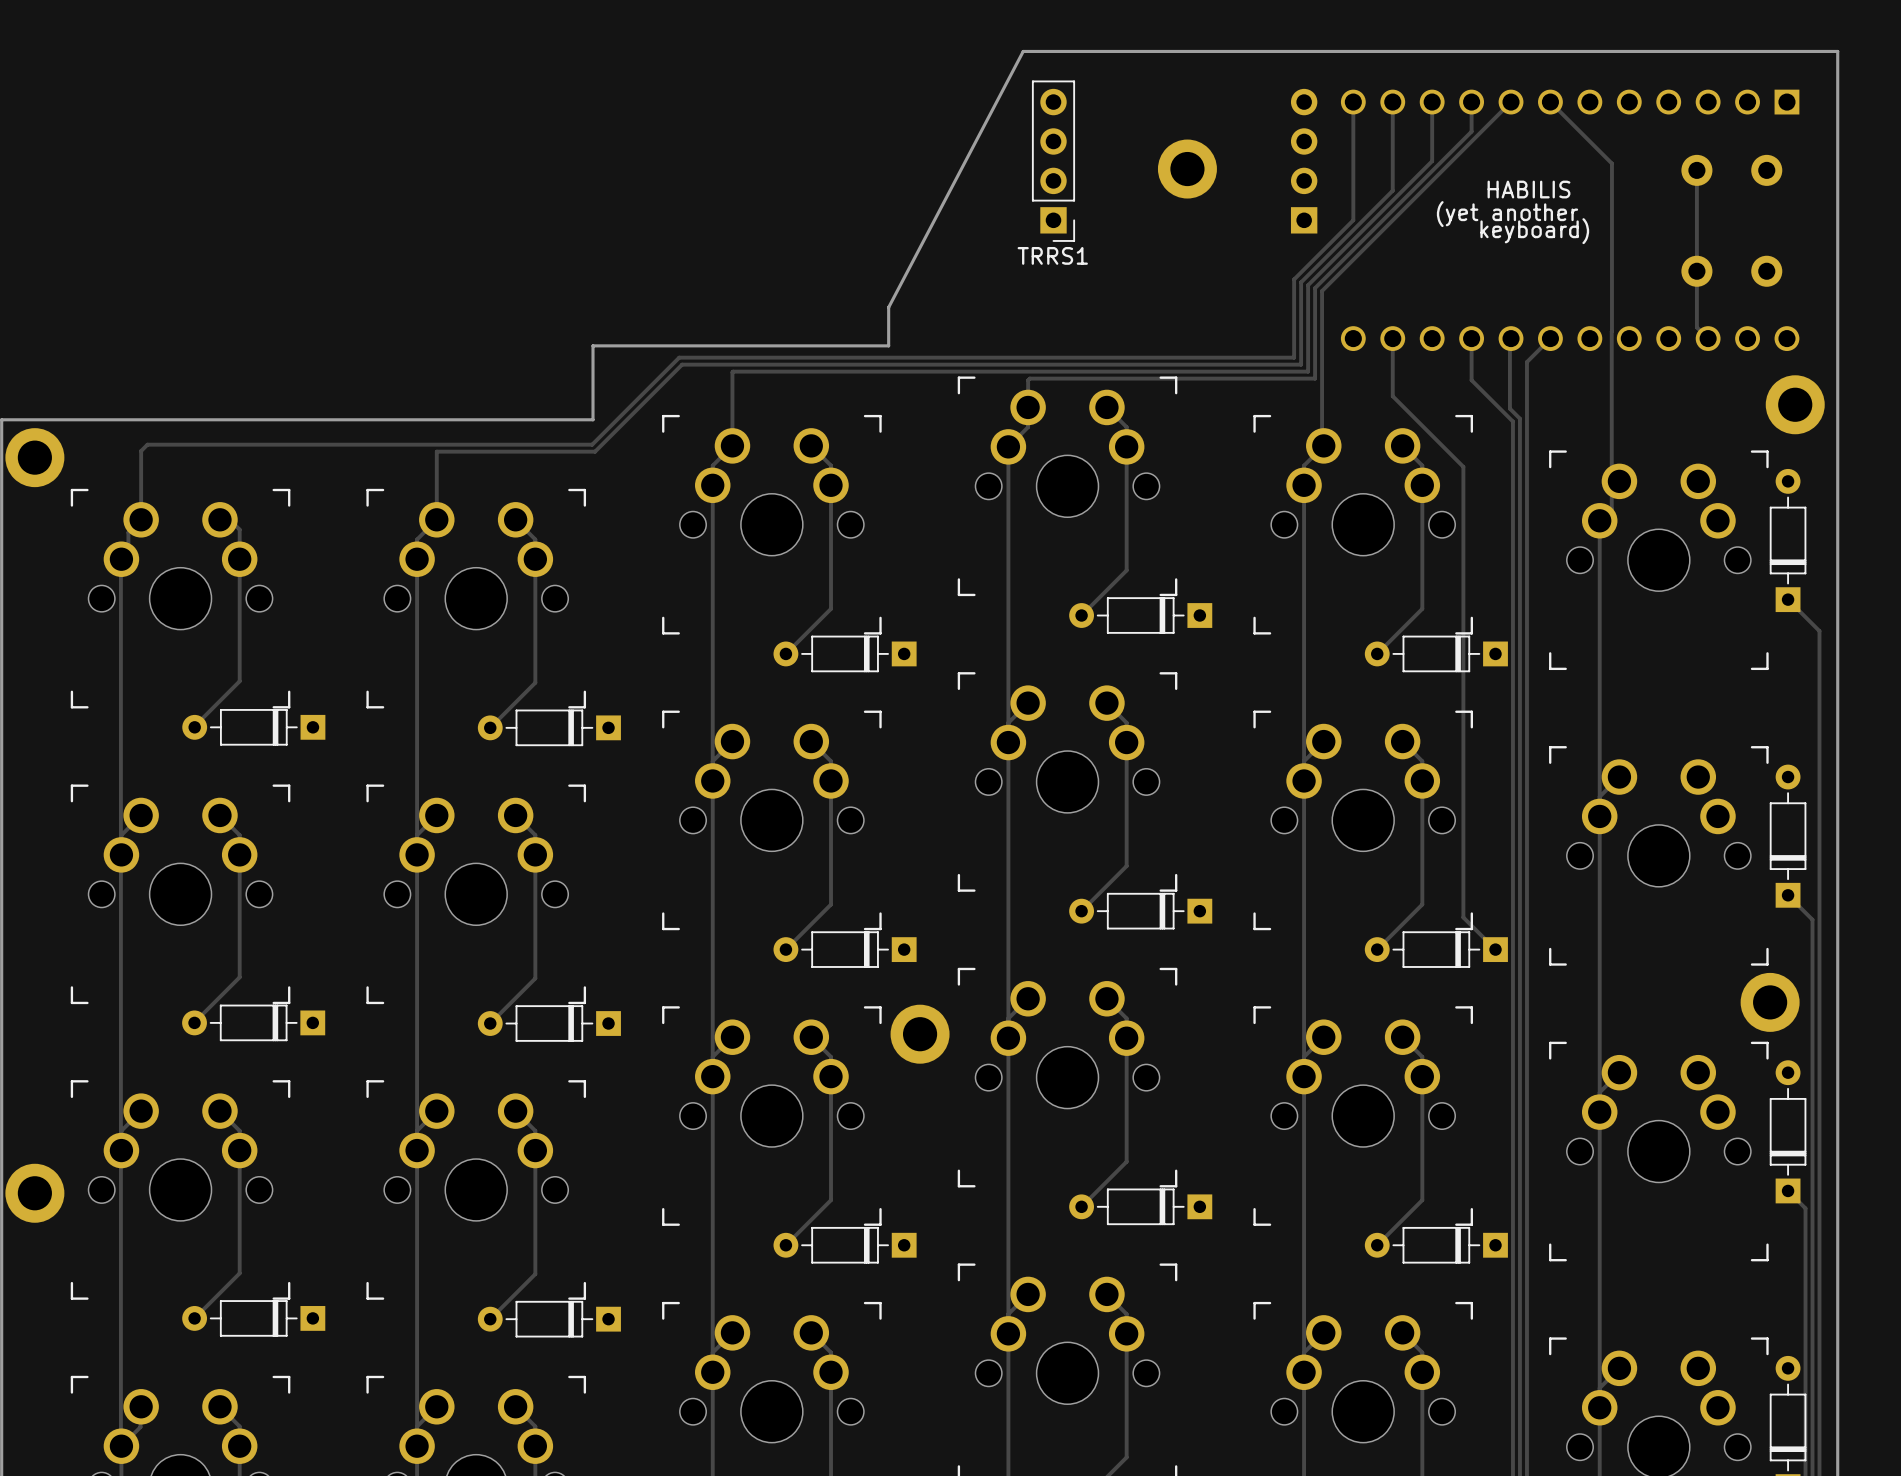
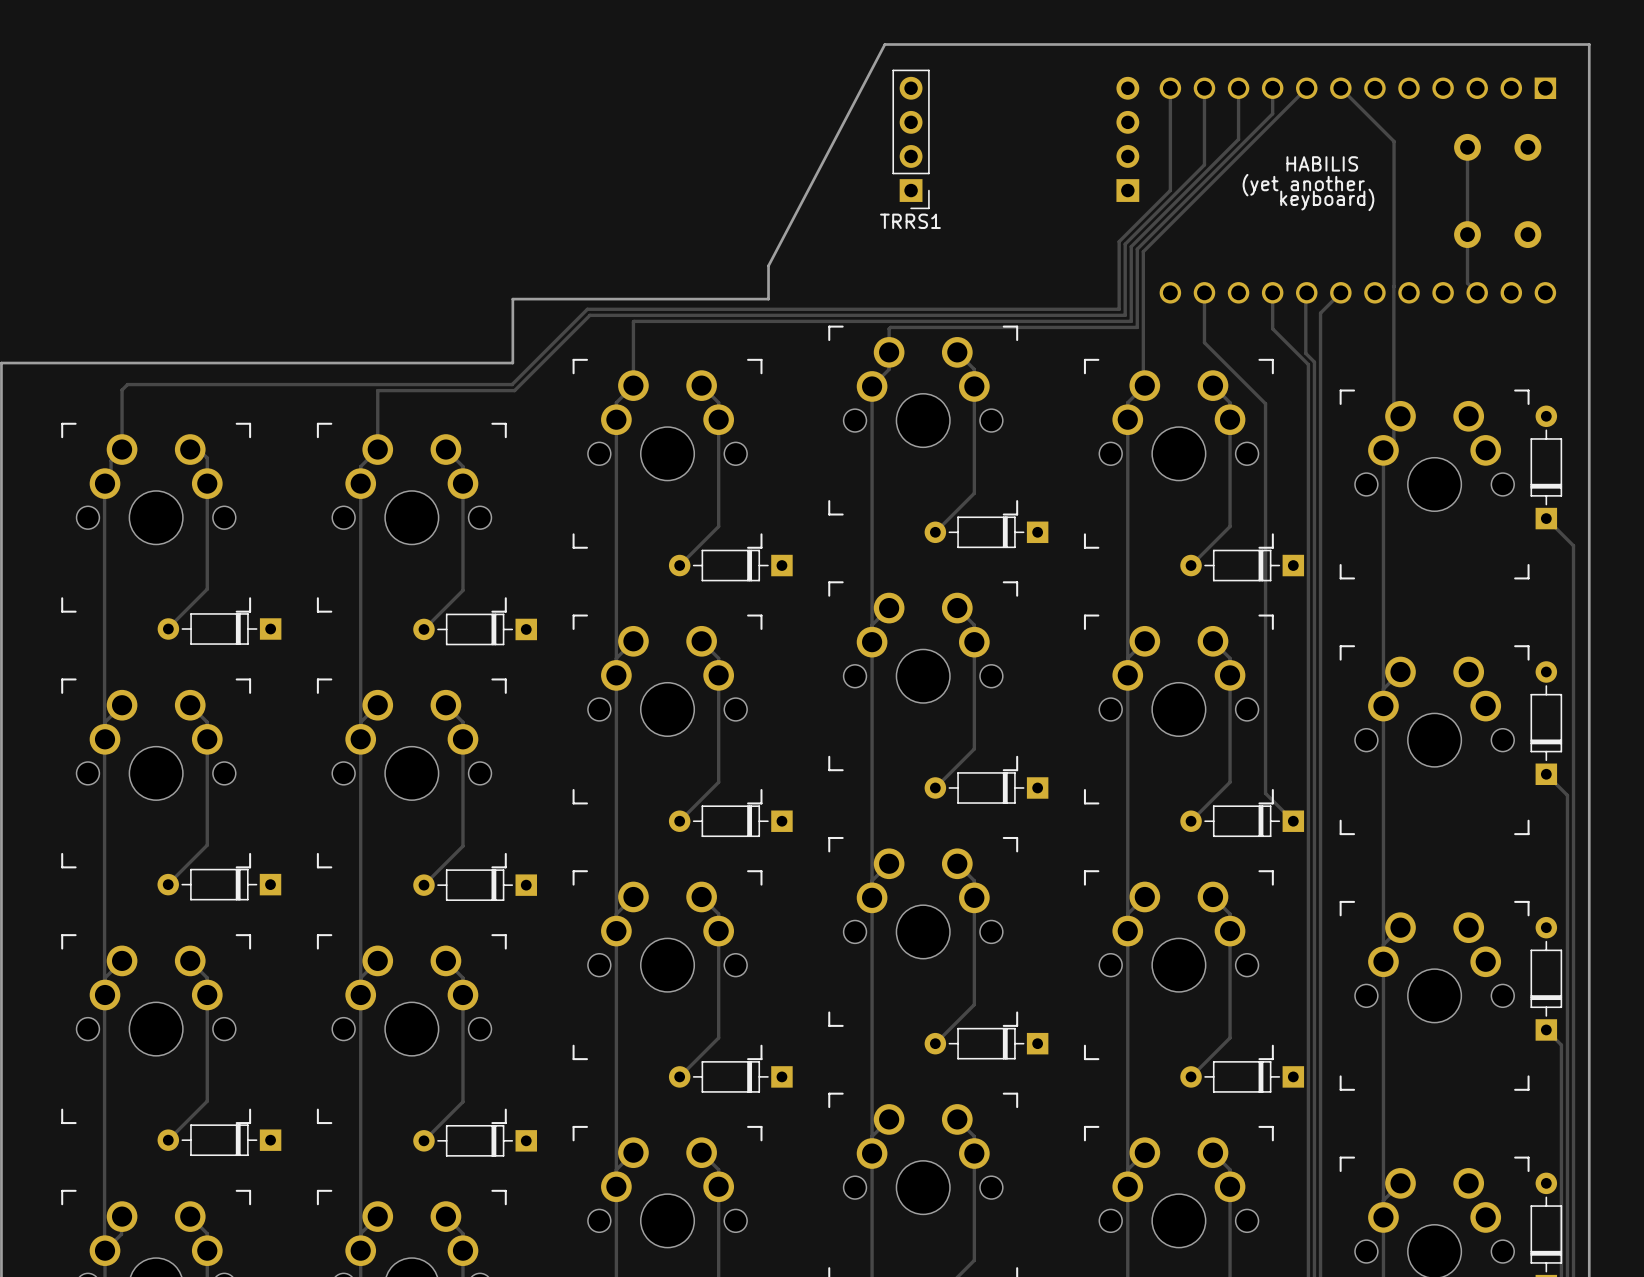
part: (1187, 169) -> none
part: (1795, 404) -> none
part: (34, 457) -> none
part: (1770, 1002) -> none
part: (920, 1034) -> none
part: (34, 1193) -> none

